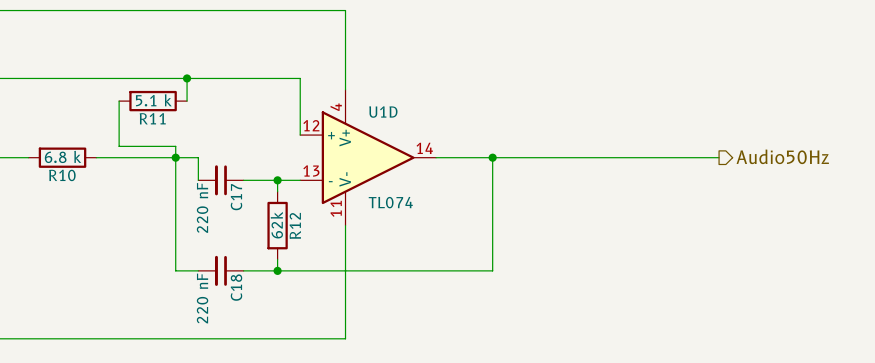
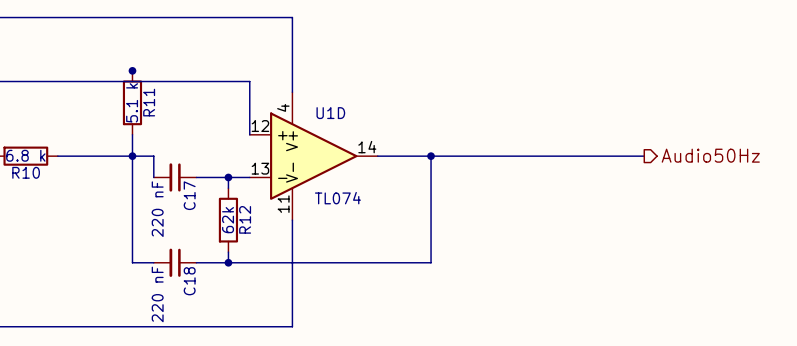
wire: (187, 78) (187, 101) -> none
junction position: (187, 78) -> (132, 70)
wire: (119, 101) (119, 146) (175, 146) -> (132, 134) (132, 145)
R11 rotation: 0° (153, 101) -> 90° clockwise (132, 102)
R11 name position: R11 (152, 118) -> R11 (149, 102)

